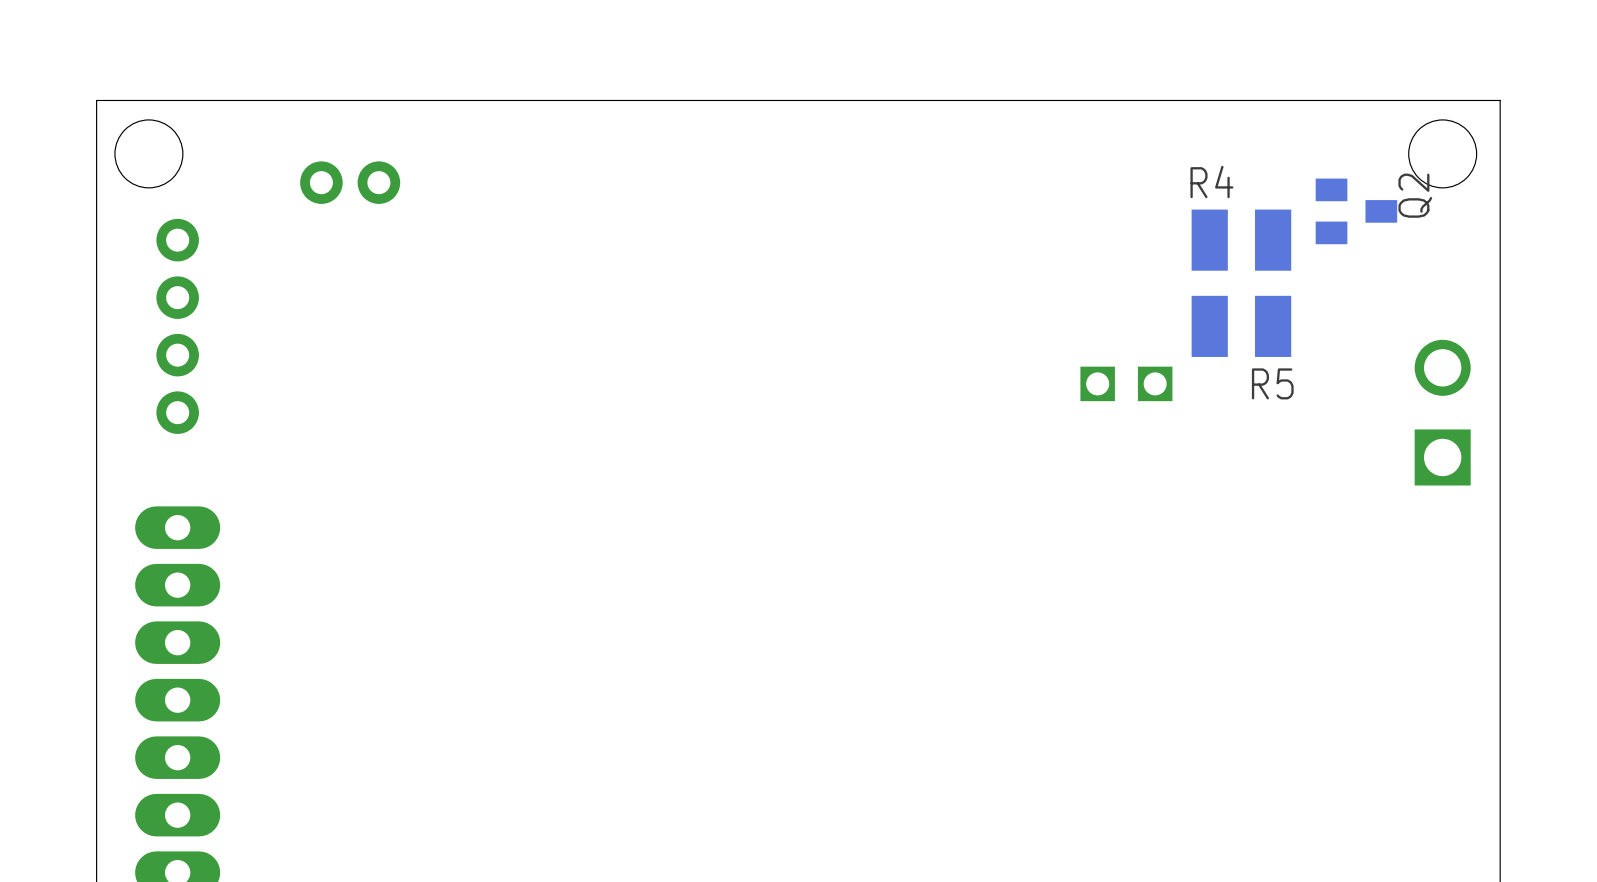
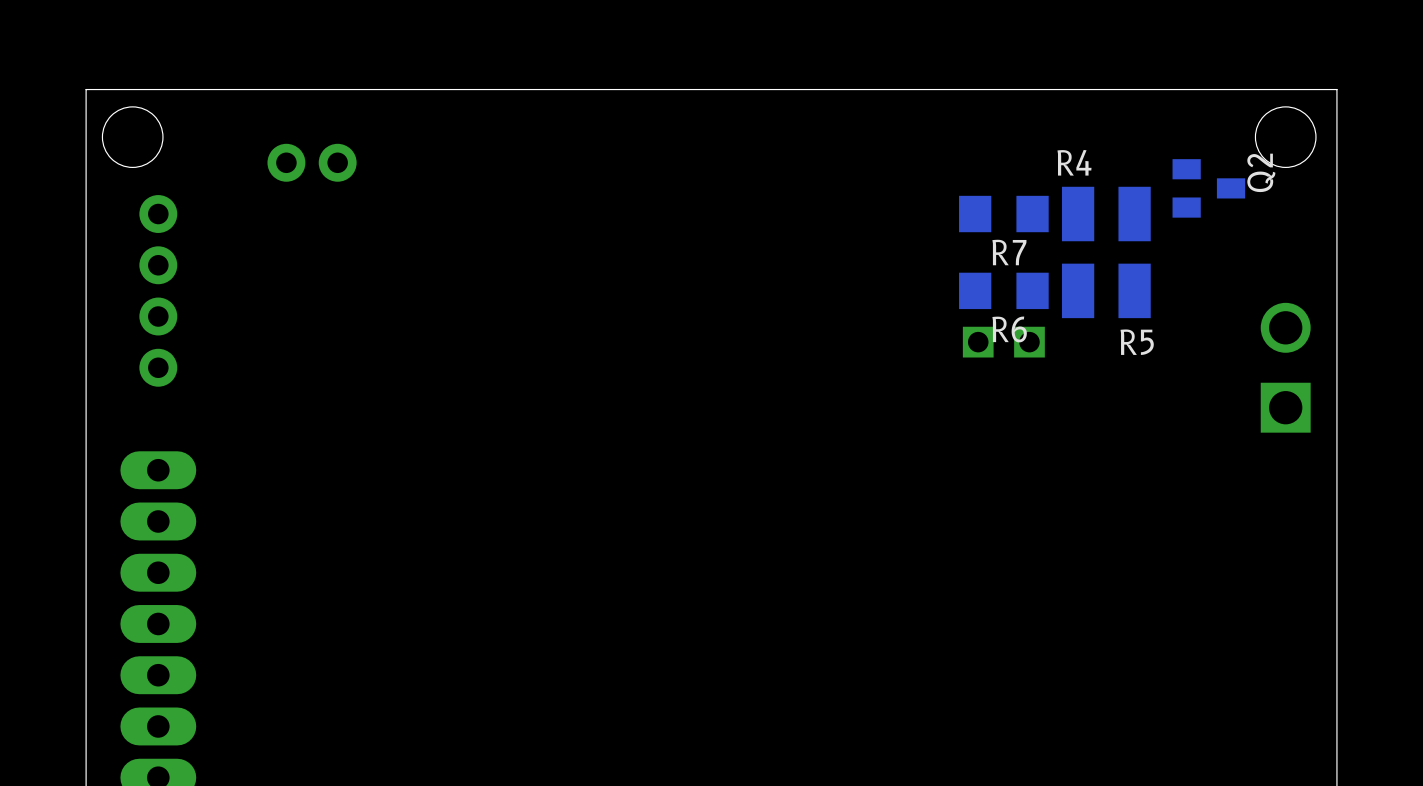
R7: none -> (1003, 214)
R6: none -> (1003, 290)

